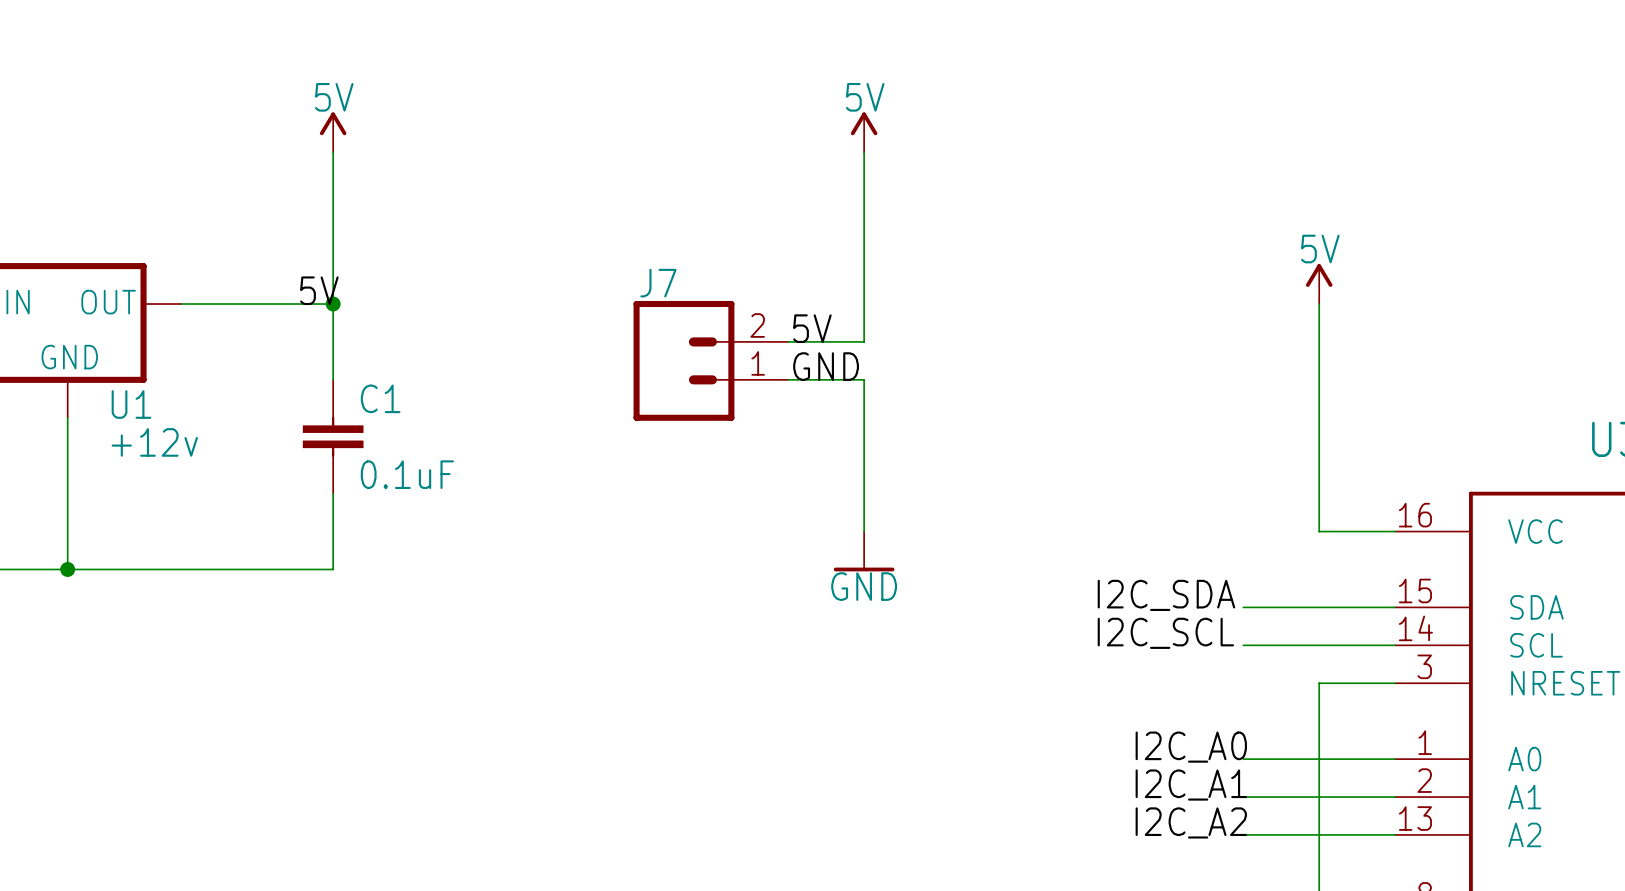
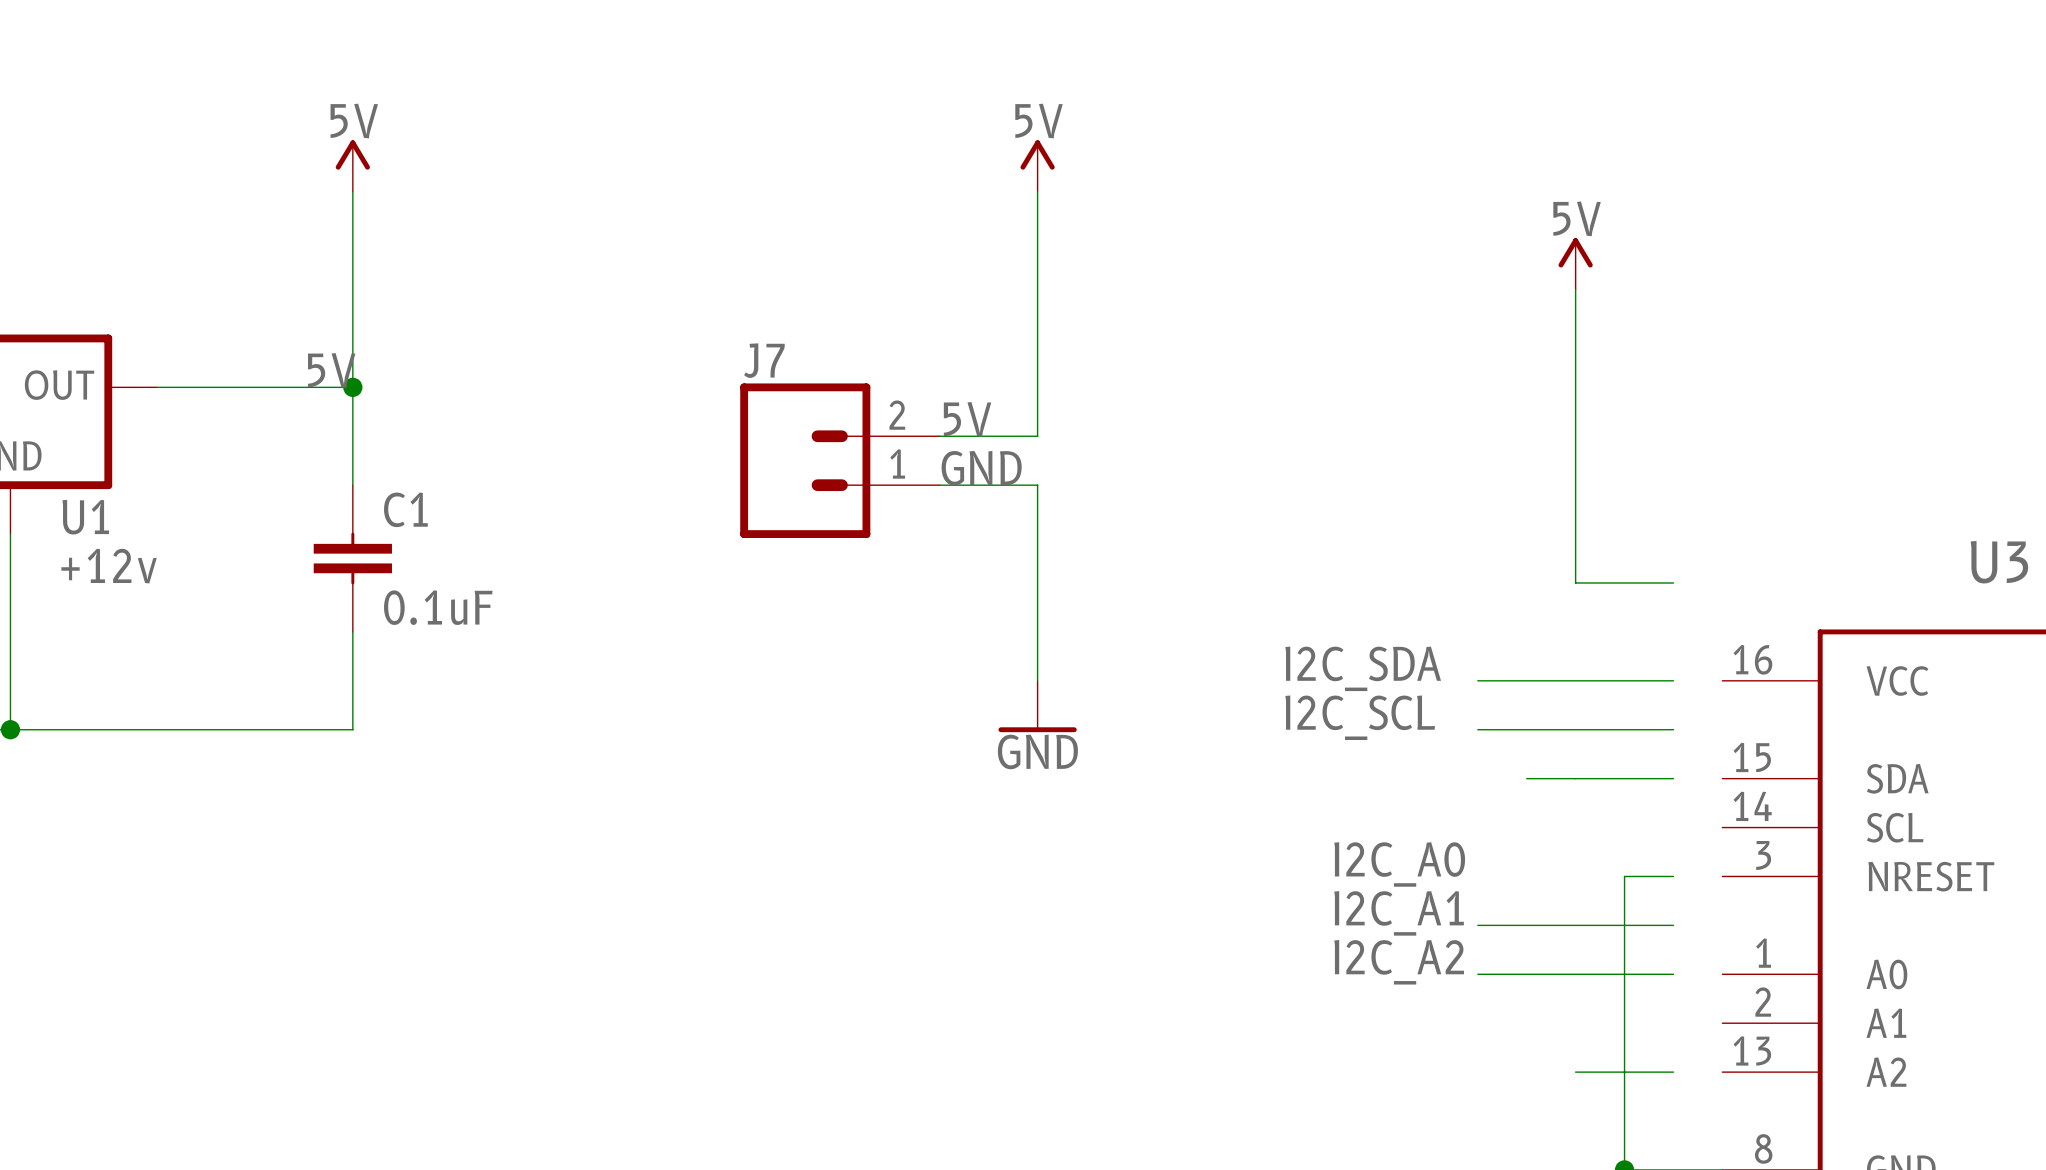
wire: none -> (1575, 289) (1575, 583) (1673, 583)
power symbol position: 5V (1319, 284) -> 5V (1575, 263)
wire: (1319, 304) (1319, 531) -> (1477, 680) (1624, 680)
wire: (1357, 531) (1395, 531) -> none
label position: I2C_SDA (1166, 595) -> I2C_SDA (1363, 668)
wire: (1357, 607) (1395, 607) -> none
label position: I2C_SCL (1165, 633) -> I2C_SCL (1360, 717)
wire: (1243, 645) (1395, 645) -> (1477, 729) (1673, 729)
wire: (1357, 683) (1395, 683) -> none
label position: I2C_A0 (1191, 747) -> I2C_A0 (1399, 864)
wire: (1357, 759) (1395, 759) -> none
label position: I2C_A1 (1191, 785) -> I2C_A1 (1399, 913)
wire: (1243, 797) (1395, 797) -> (1477, 925) (1673, 925)
label position: I2C_A2 (1191, 822) -> I2C_A2 (1399, 962)
wire: (1243, 834) (1281, 834) -> (1477, 974) (1526, 974)
wire: (1357, 834) (1395, 834) -> none

